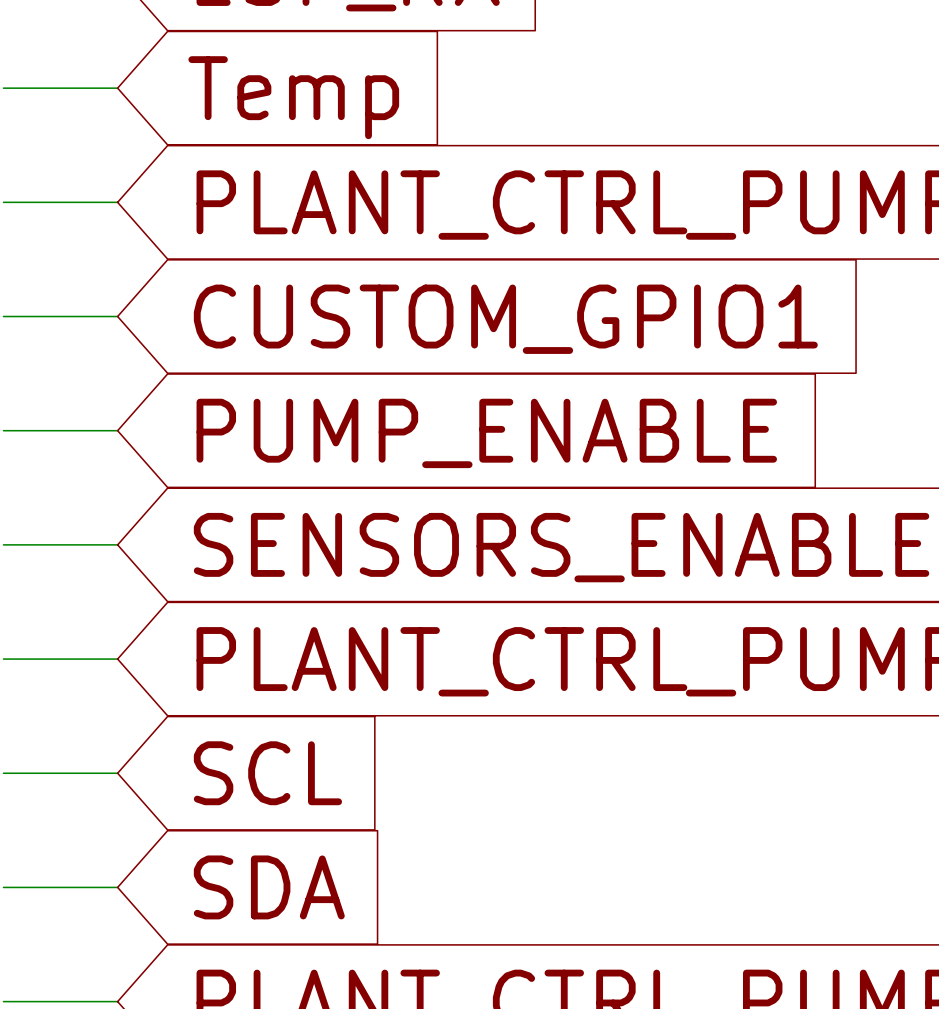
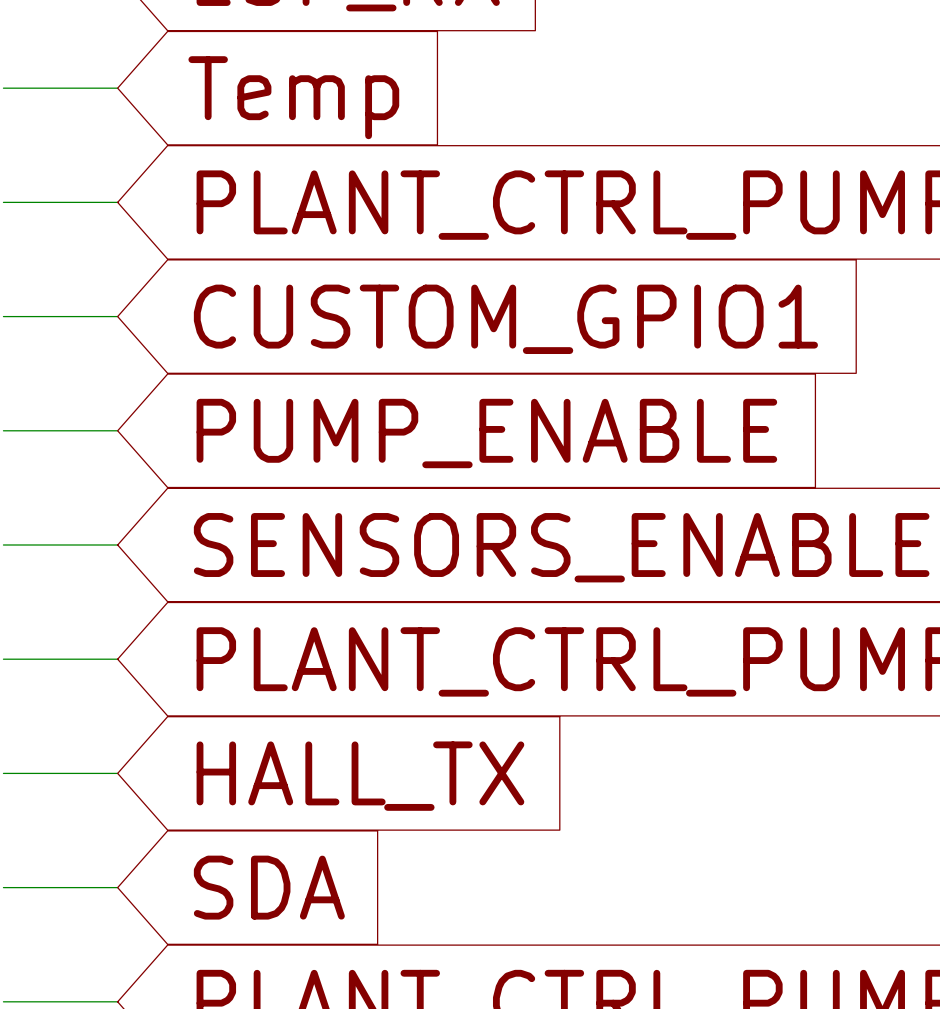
global label: SCL (267, 773) -> HALL_TX (360, 776)

